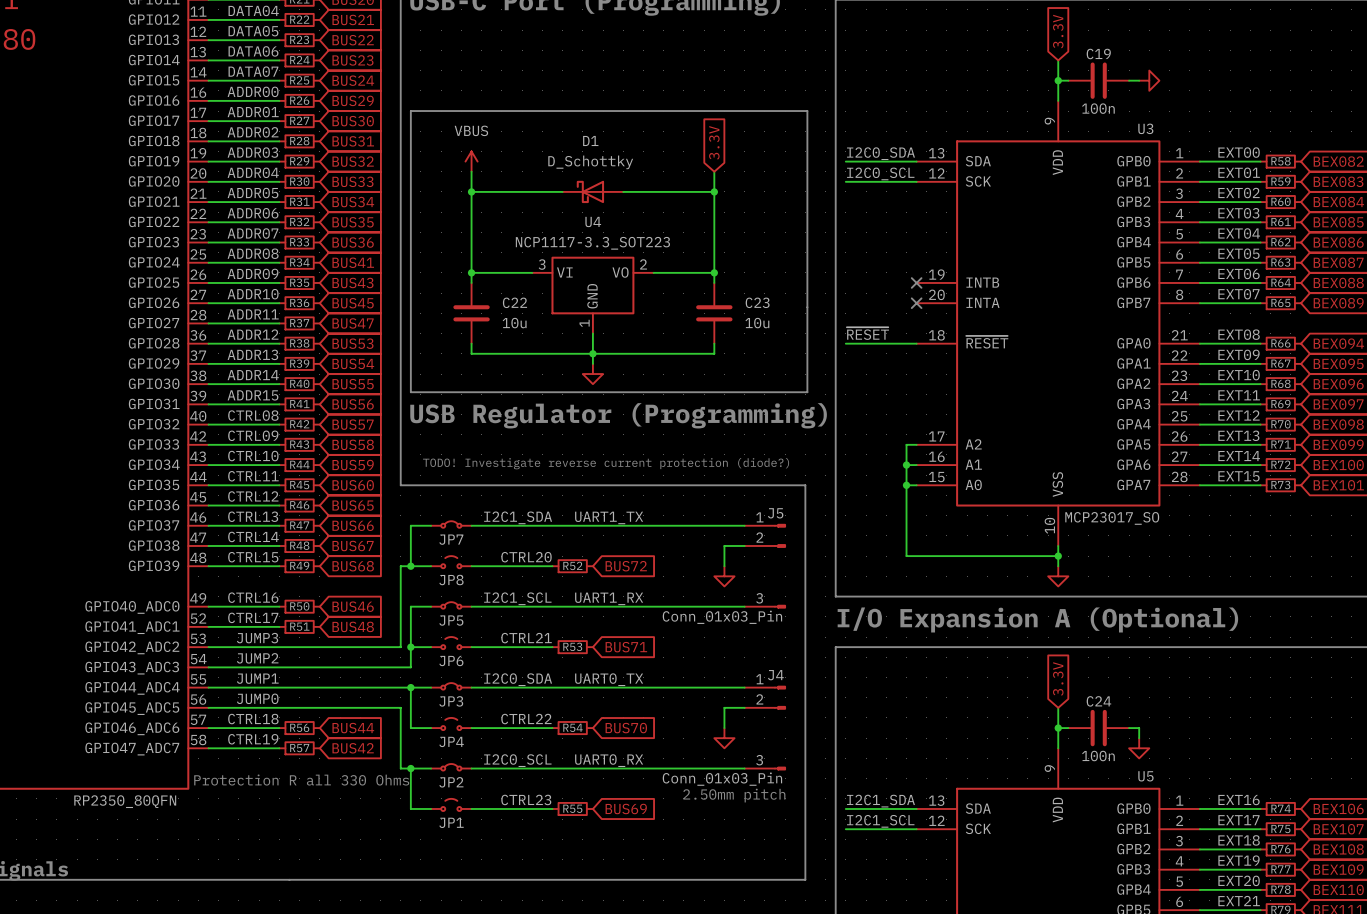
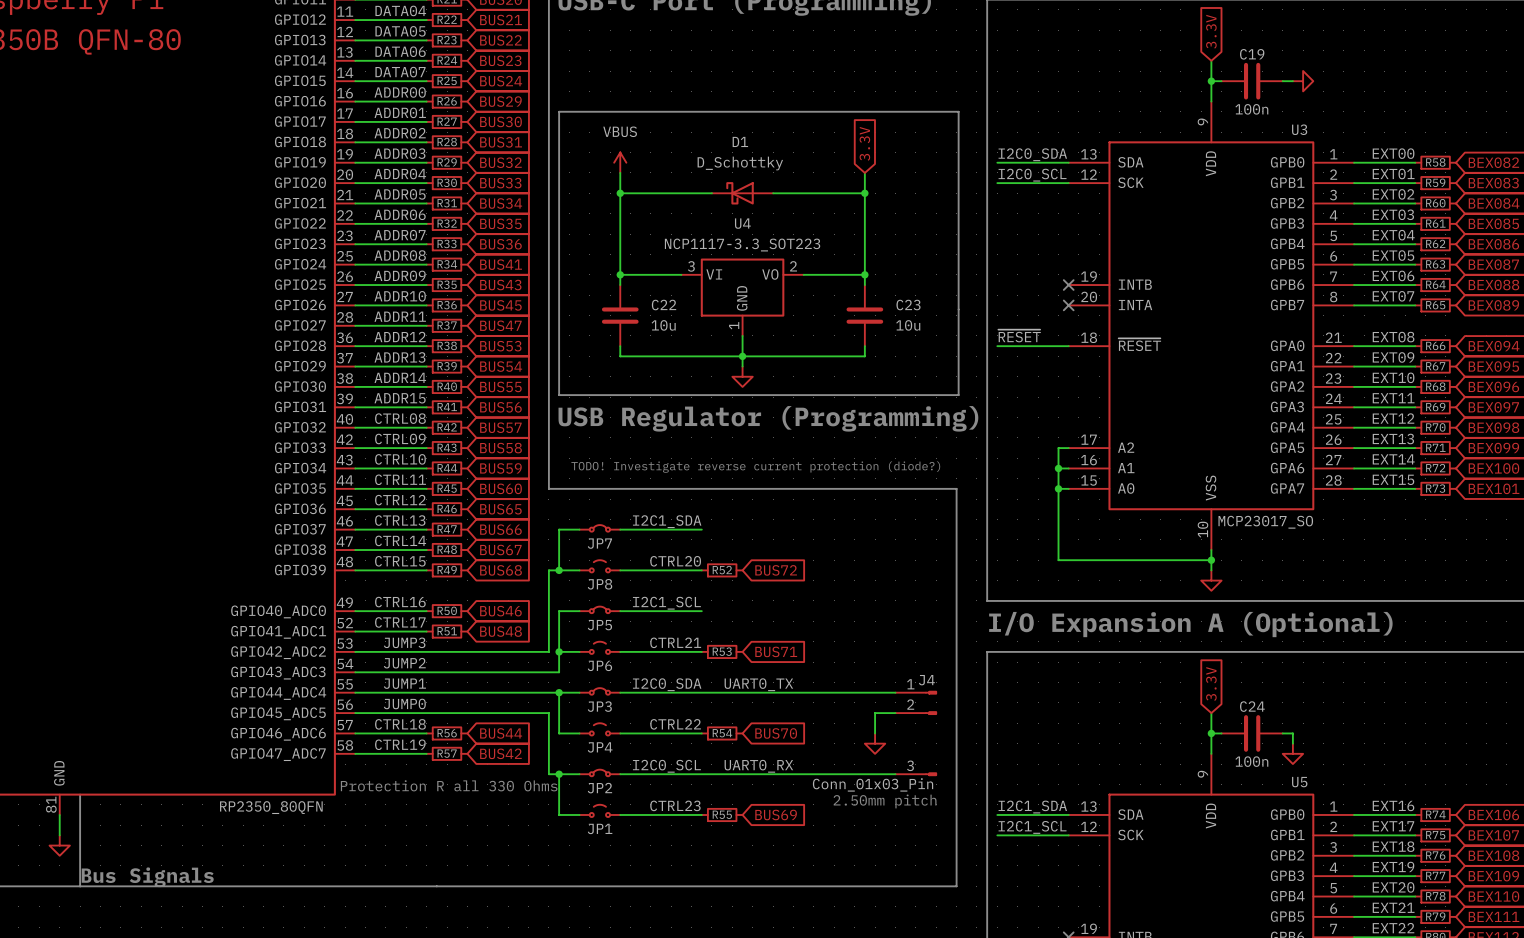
label: UART1_TX (609, 517) -> none
wire: (552, 525) (744, 525) -> none
wire: (744, 545) (724, 545) (724, 566) -> none
J5: Conn_01x03_Pin (765, 566) -> none
power symbol: (724, 576) -> none
label: UART1_RX (609, 598) -> none
wire: (552, 606) (744, 606) -> none

